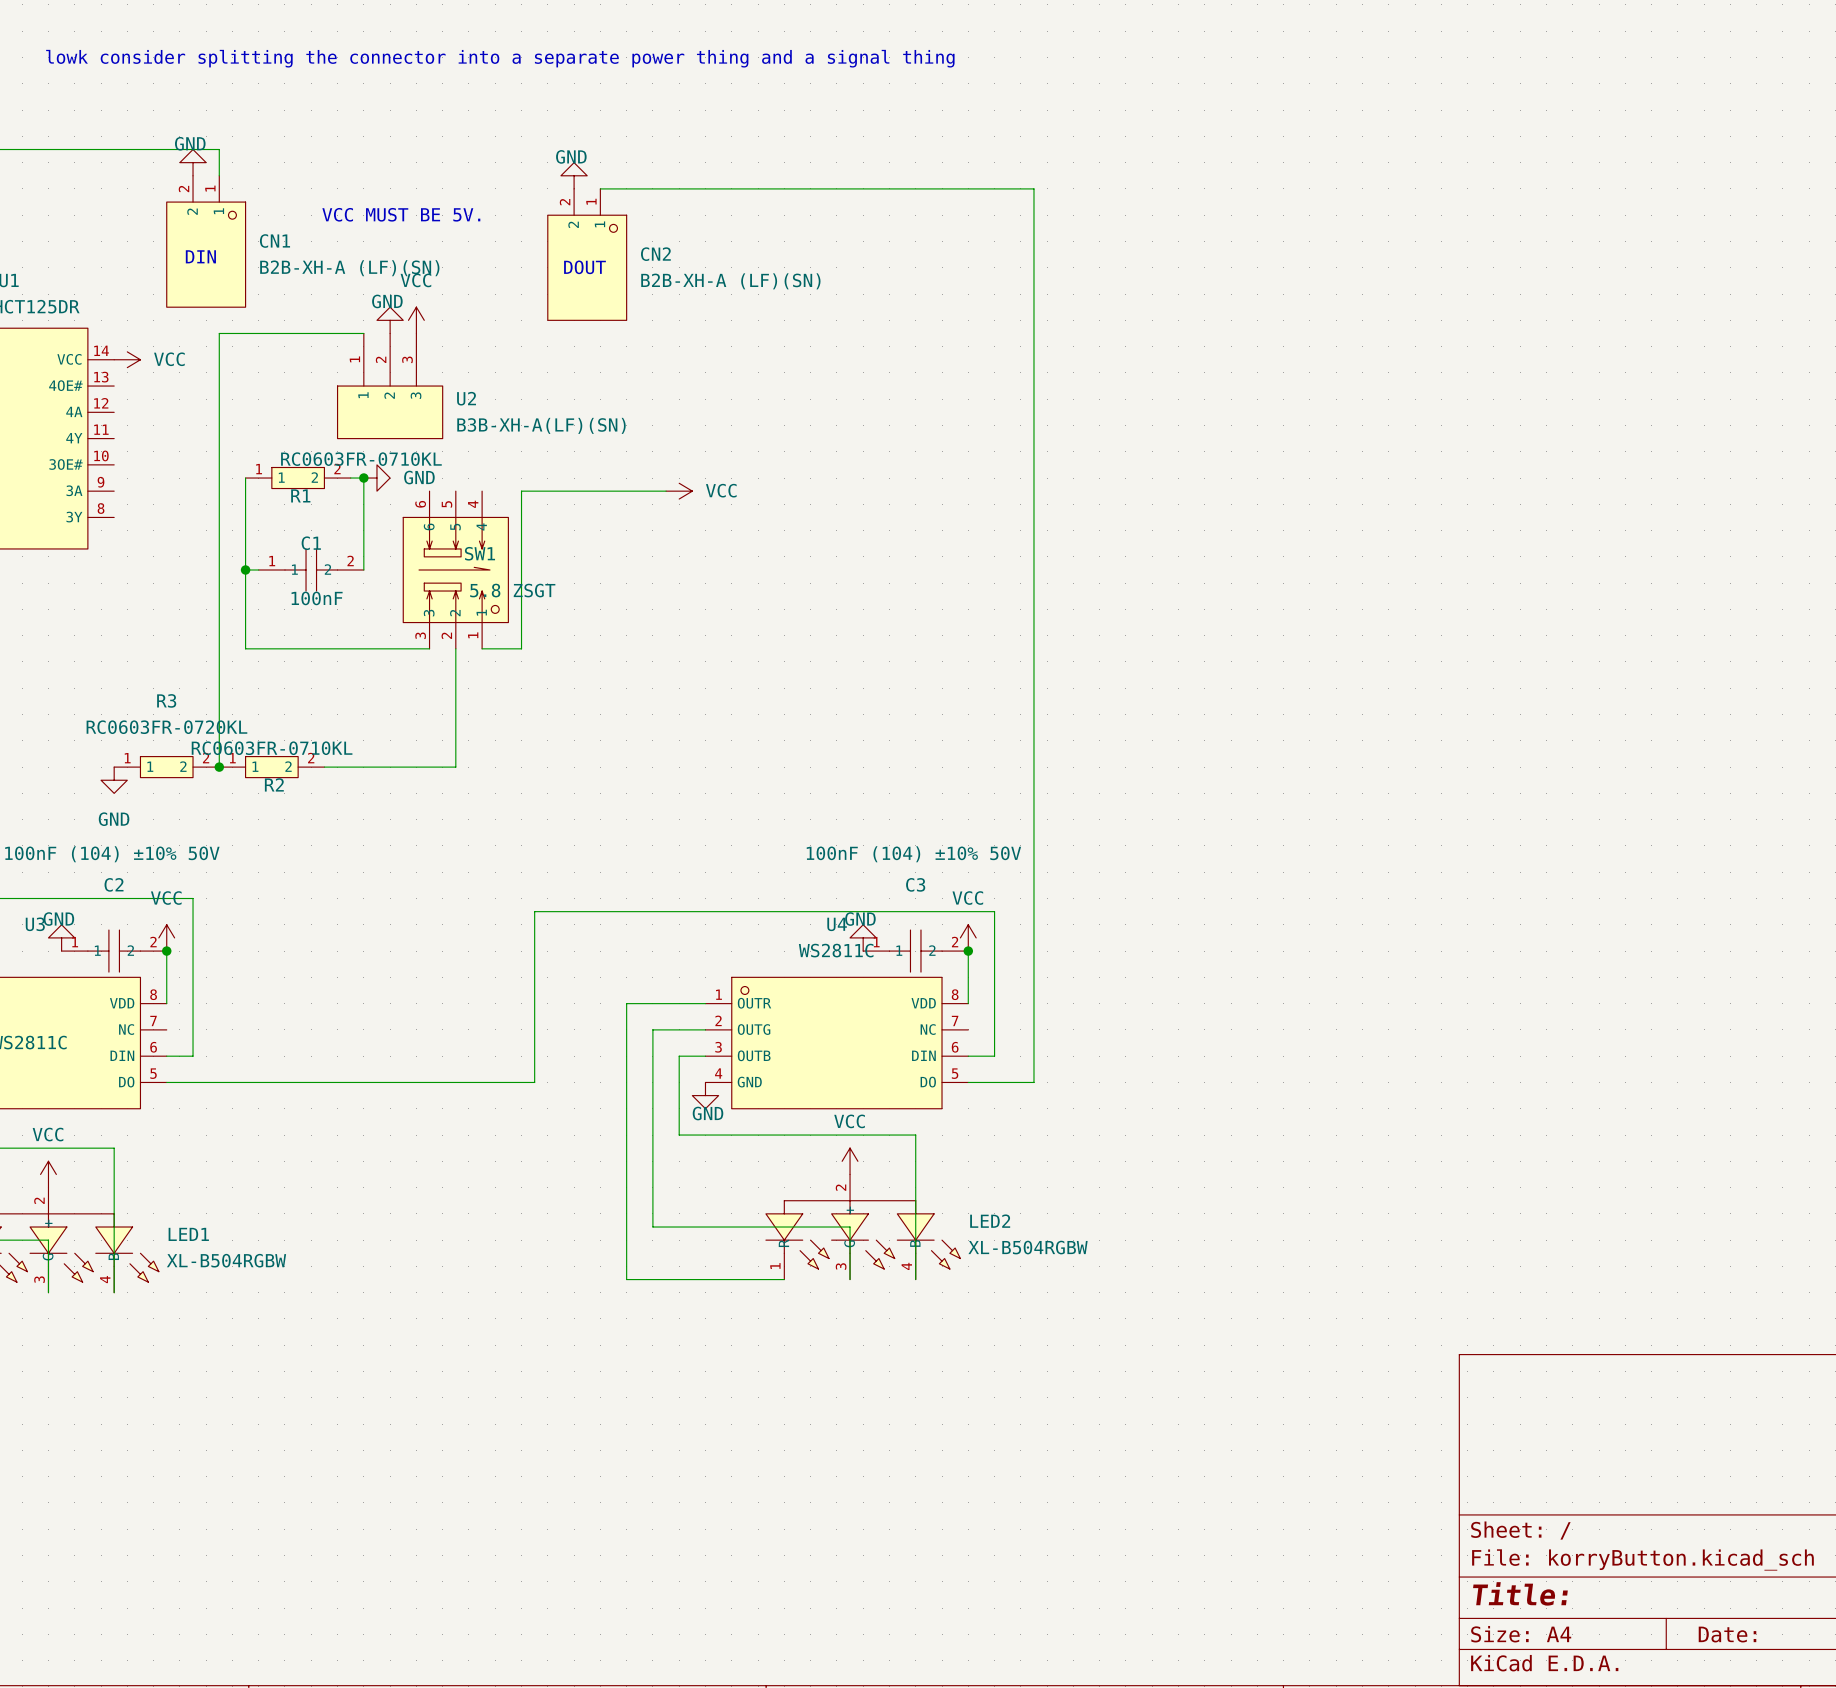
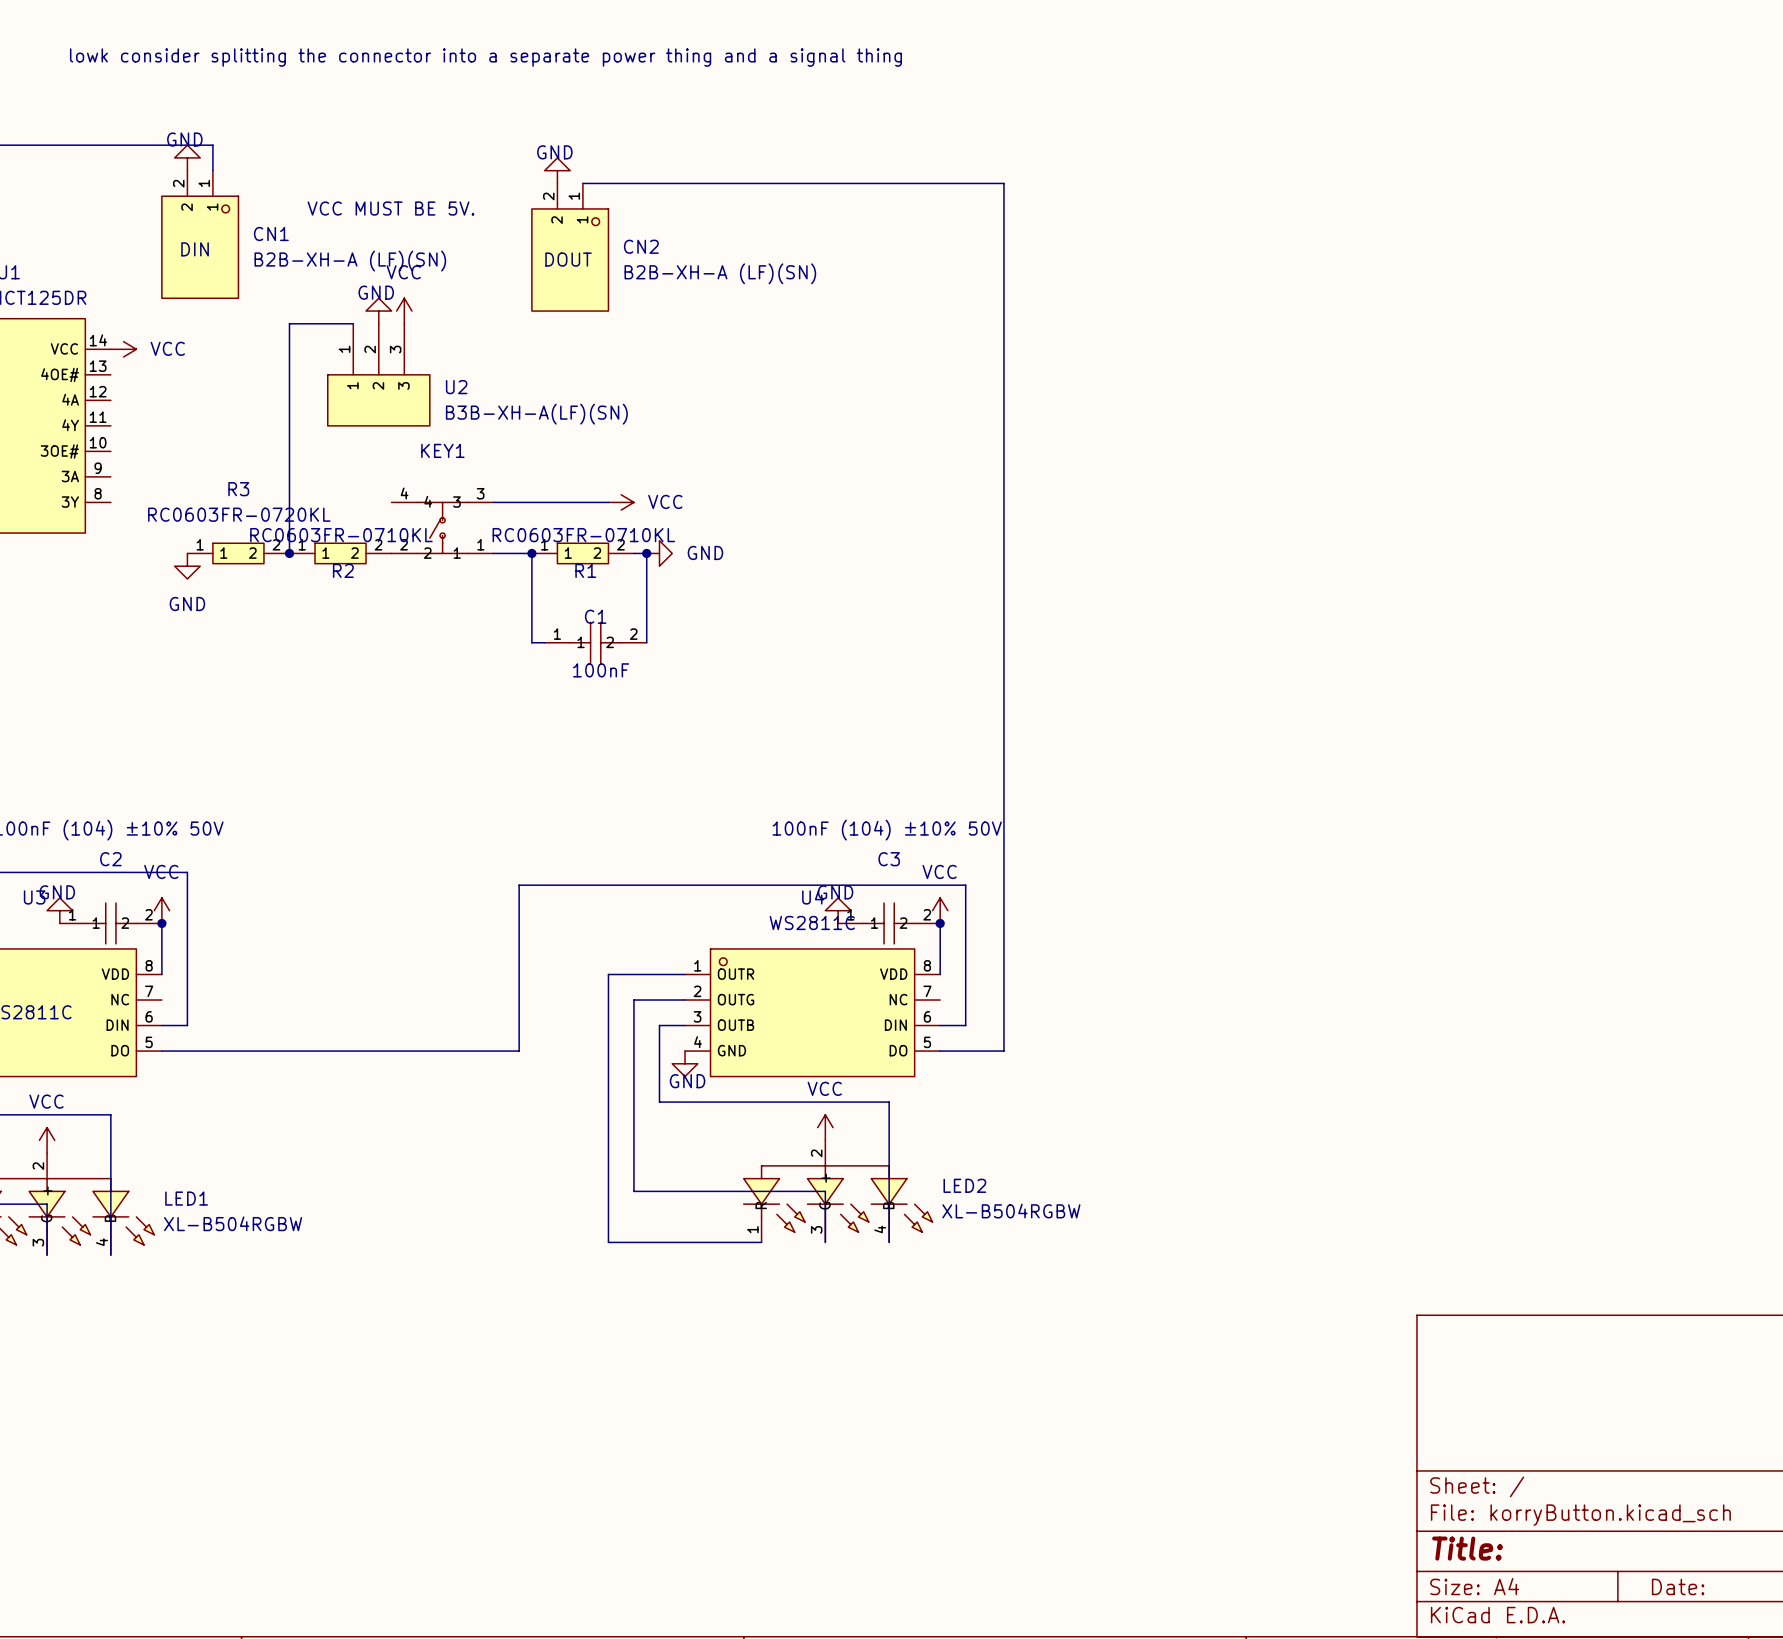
wire: (298, 333) (219, 333) (219, 767) -> (289, 323) (289, 553)
R1 value position: RC0603FR-0710KL (361, 459) -> RC0603FR-0710KL (583, 535)
wire: (245, 478) (245, 648) (429, 648) -> none
R1 position: (298, 478) -> (582, 553)
wire: (350, 478) (363, 478) (363, 569) -> none
junction: (363, 478) -> none
power symbol: GND (376, 478) -> none
wire: (666, 491) (521, 491) (521, 648) (482, 648) -> none
power symbol position: VCC (679, 491) -> VCC (621, 502)
wire: none -> (493, 502) (608, 502)
KEY1: none -> (442, 527)
junction position: (245, 569) -> (289, 553)
C1 position: (311, 569) -> (595, 642)
SW1: 5.8 ZSGT (455, 569) -> none
wire: none -> (493, 553) (531, 553) (531, 642) (544, 642)
junction: none -> (531, 553)
wire: none -> (633, 553) (646, 553) (646, 642)
junction: none -> (646, 553)
power symbol: none -> GND (659, 553)
power symbol: none -> GND (187, 566)
wire: (455, 648) (455, 767) (324, 767) -> none
R3 position: (166, 767) -> (238, 553)
junction: (219, 767) -> none
R2 position: (271, 767) -> (340, 553)
power symbol: GND (114, 780) -> none

